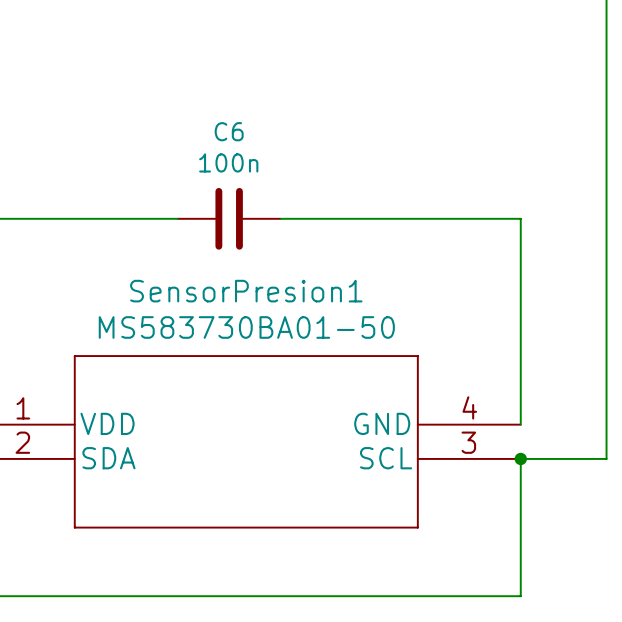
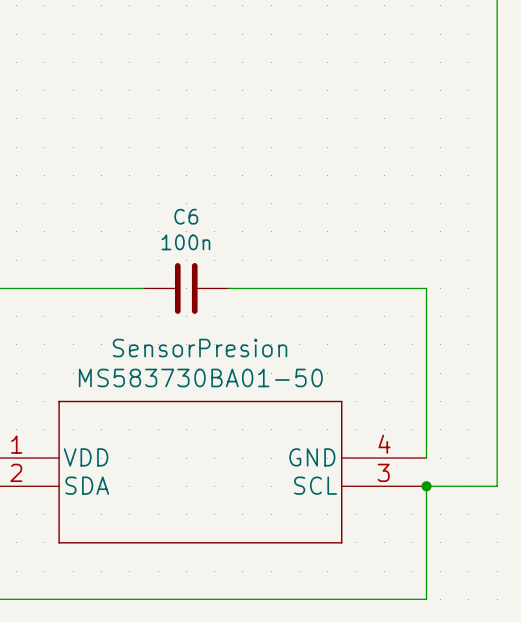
SensorPresion1 name: SensorPresion1 (246, 291) -> SensorPresion (200, 348)

